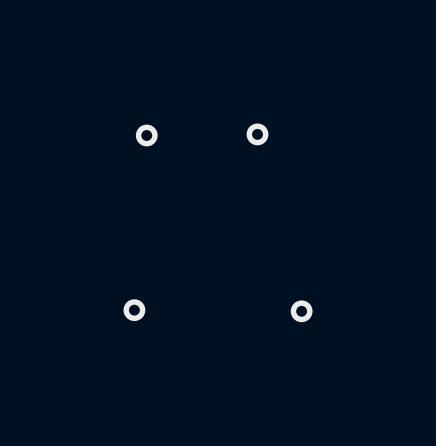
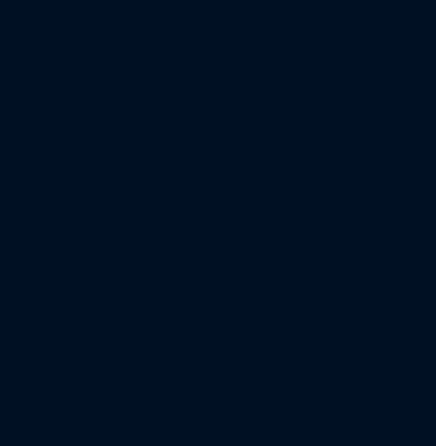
via: (257, 134) -> none
via: (146, 135) -> none
via: (134, 310) -> none
via: (301, 311) -> none

